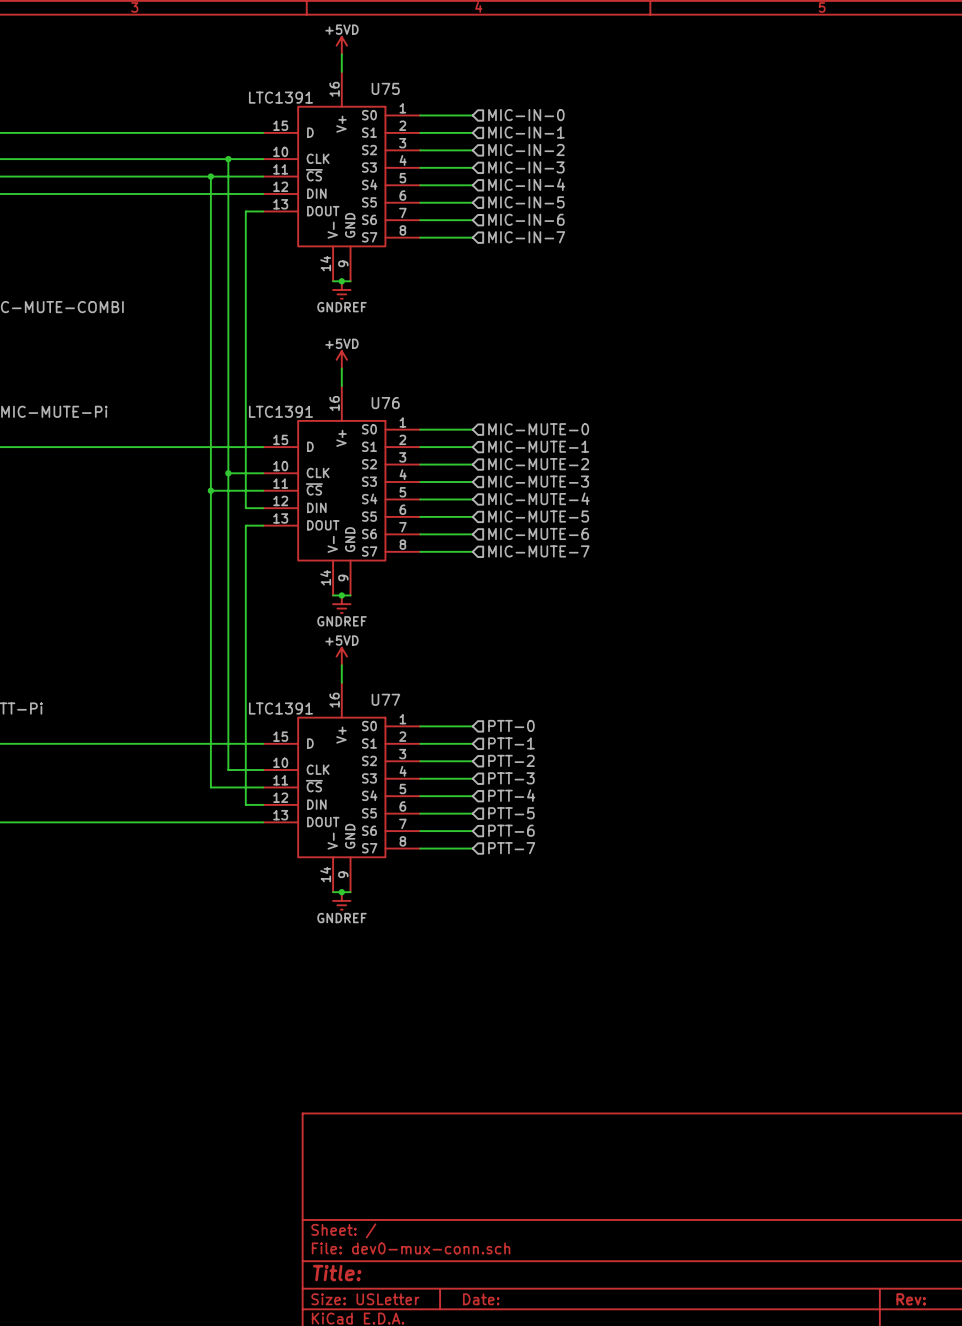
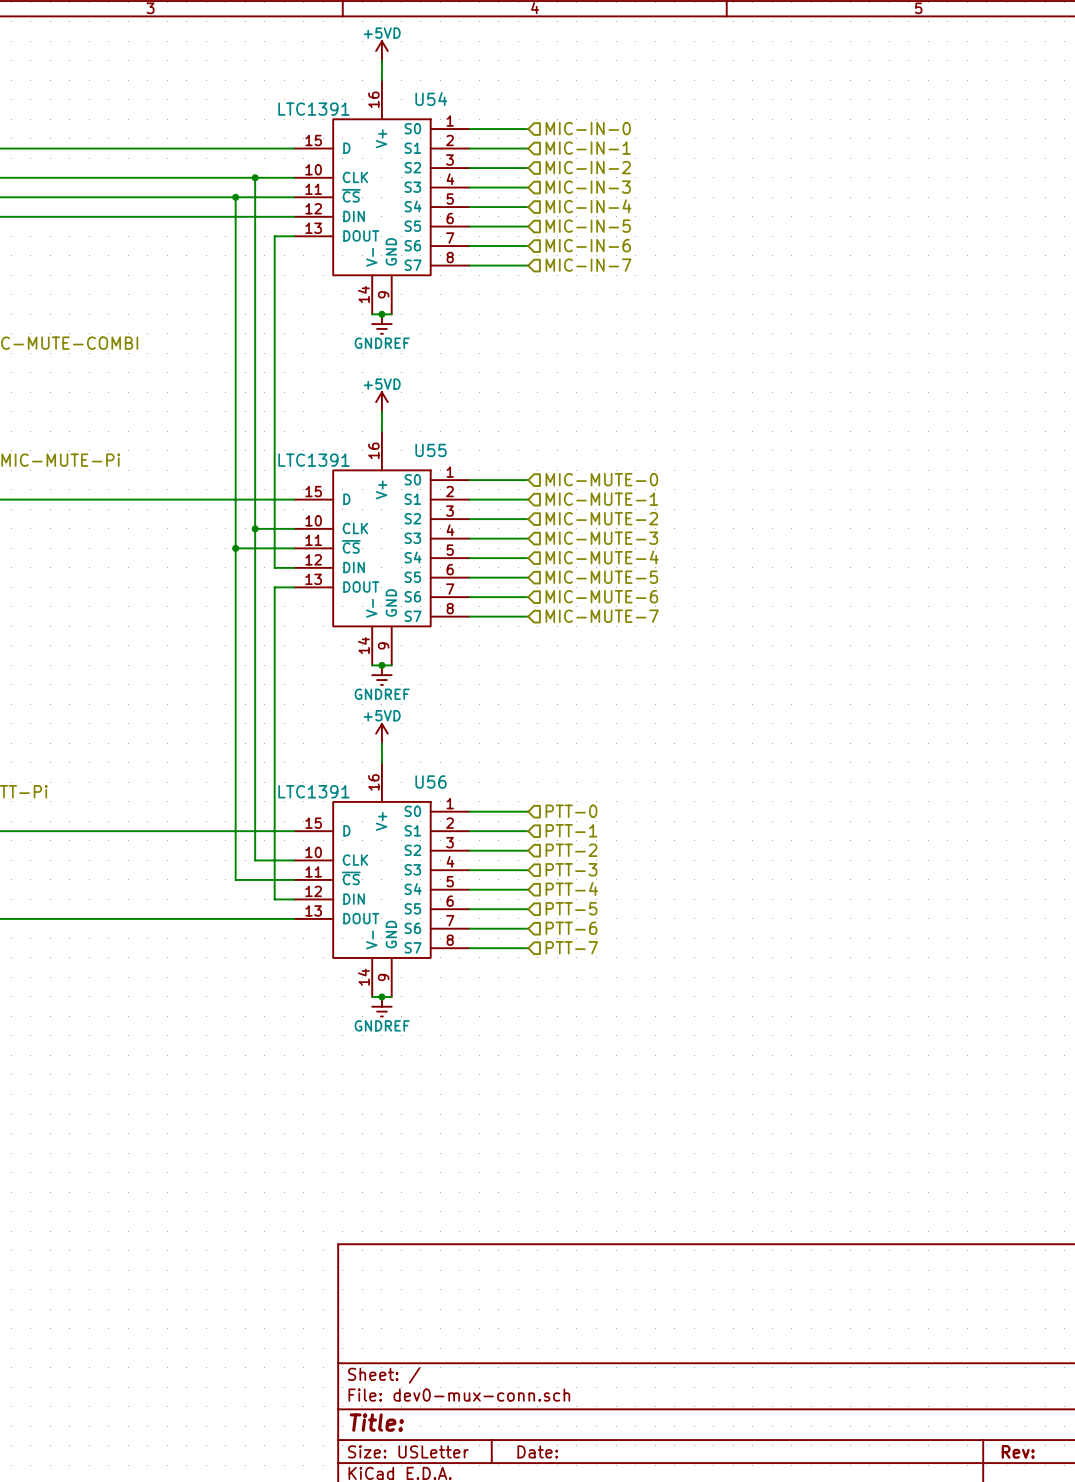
U75 name: U75 (385, 88) -> U54 (431, 99)
U76 name: U76 (385, 403) -> U55 (430, 450)
U77 name: U77 (385, 699) -> U56 (430, 781)

